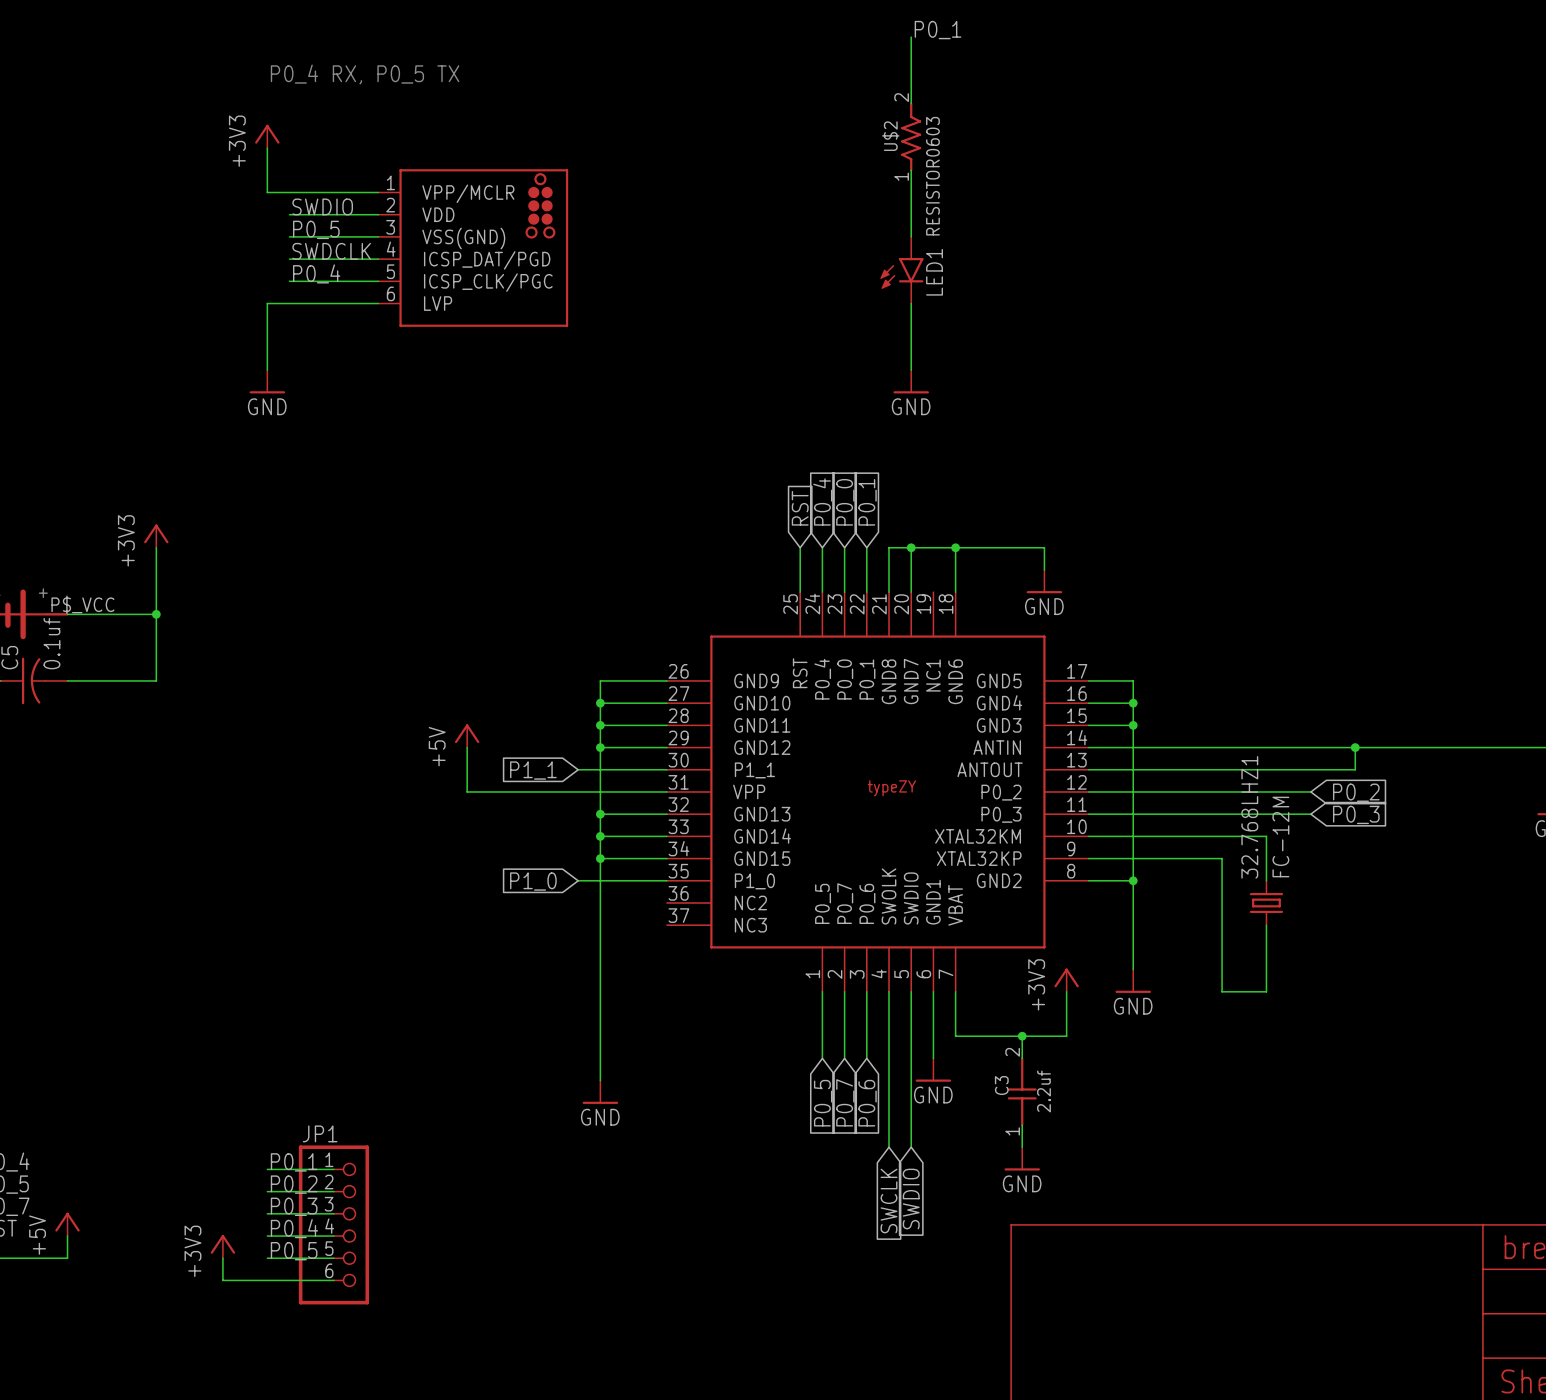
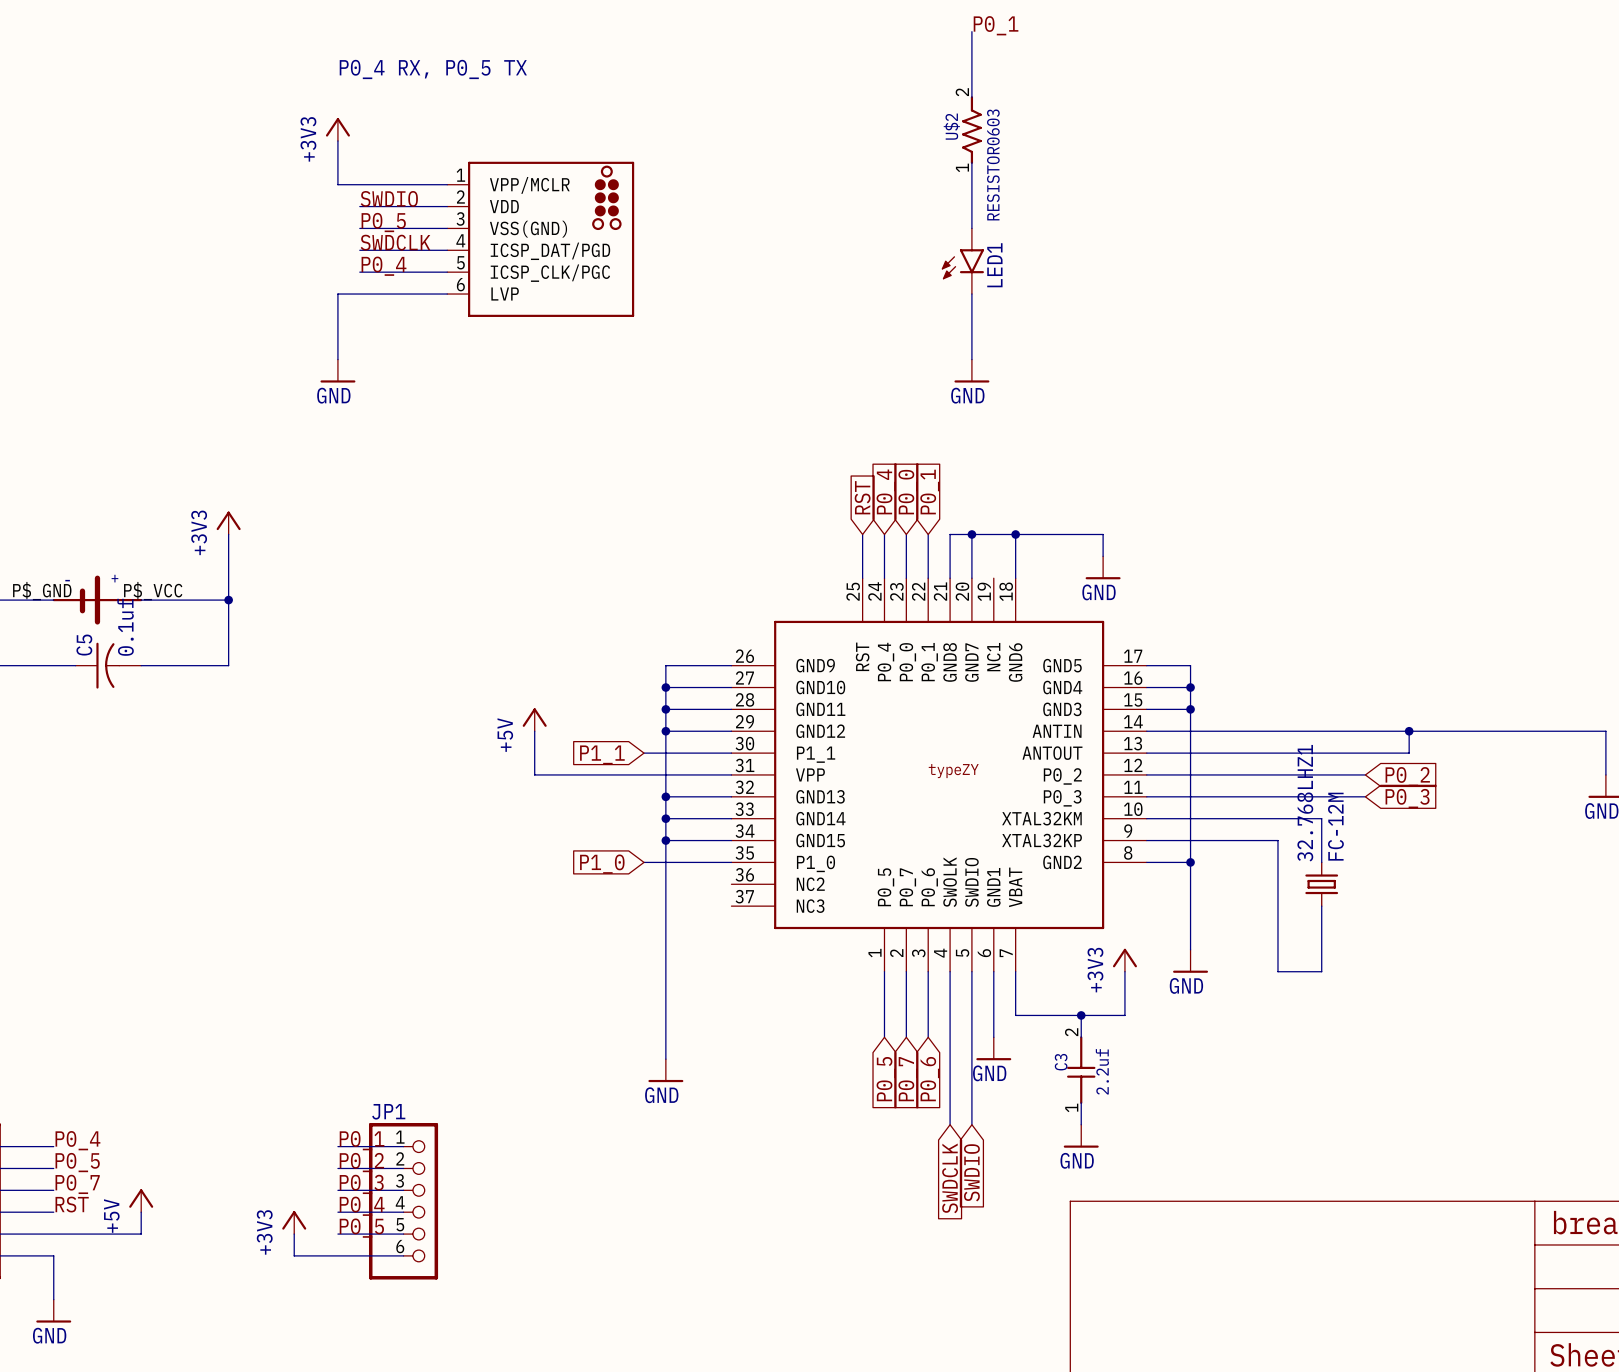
global label: SWCLK (889, 1200) -> SWDCLK (950, 1178)

